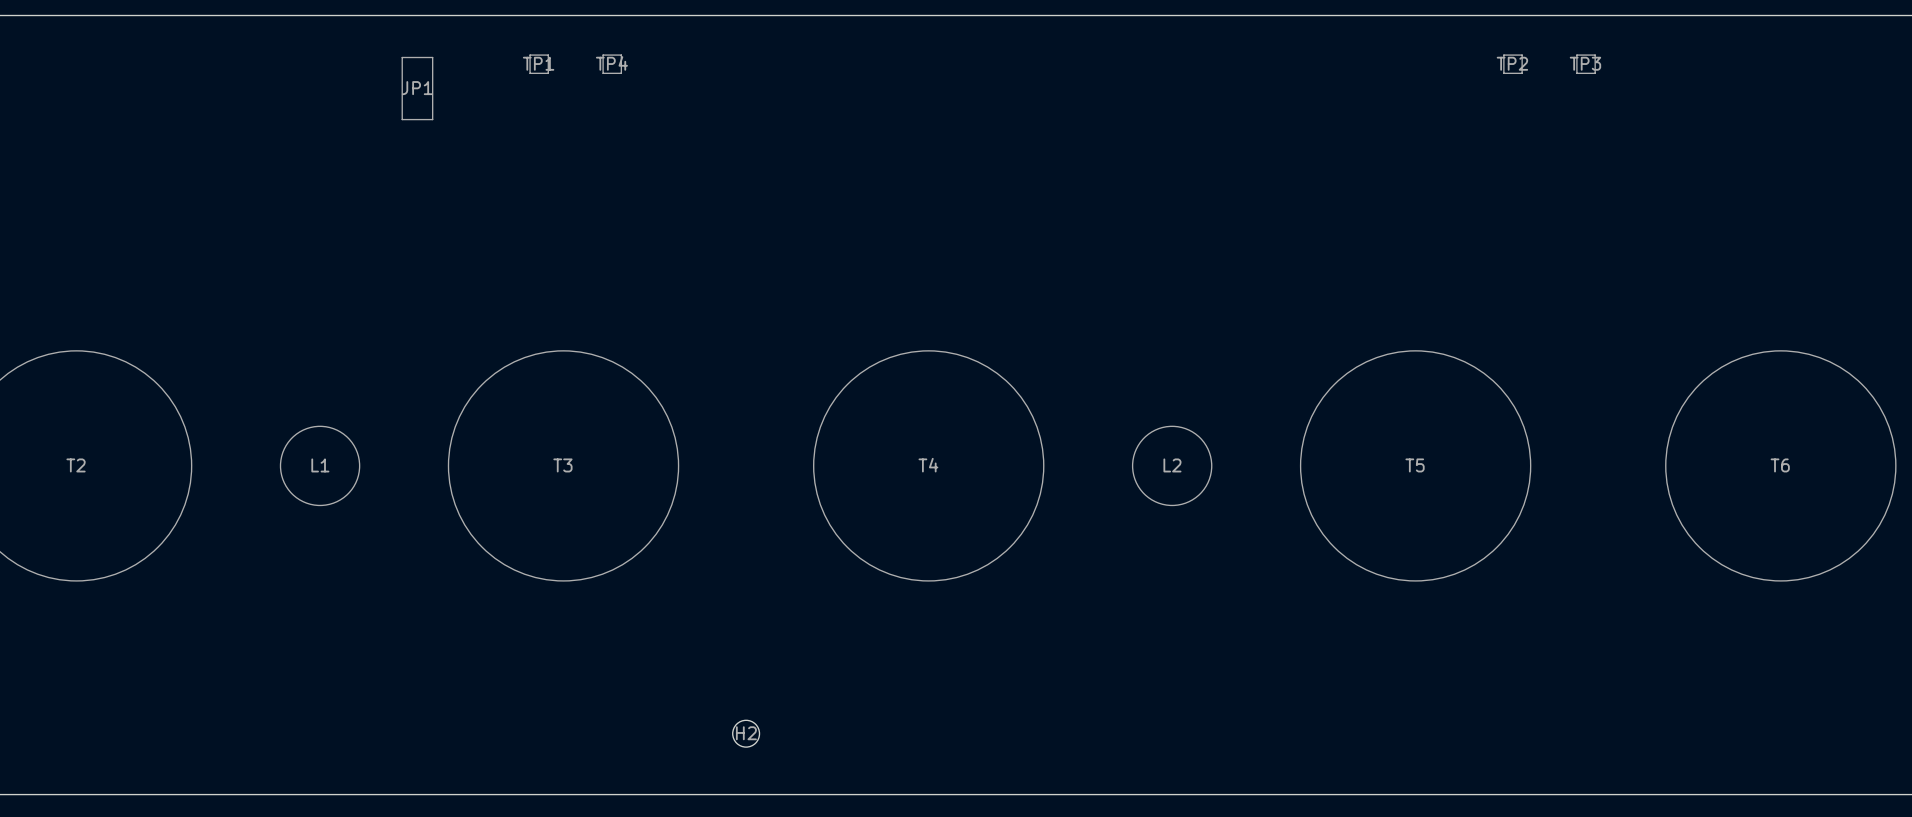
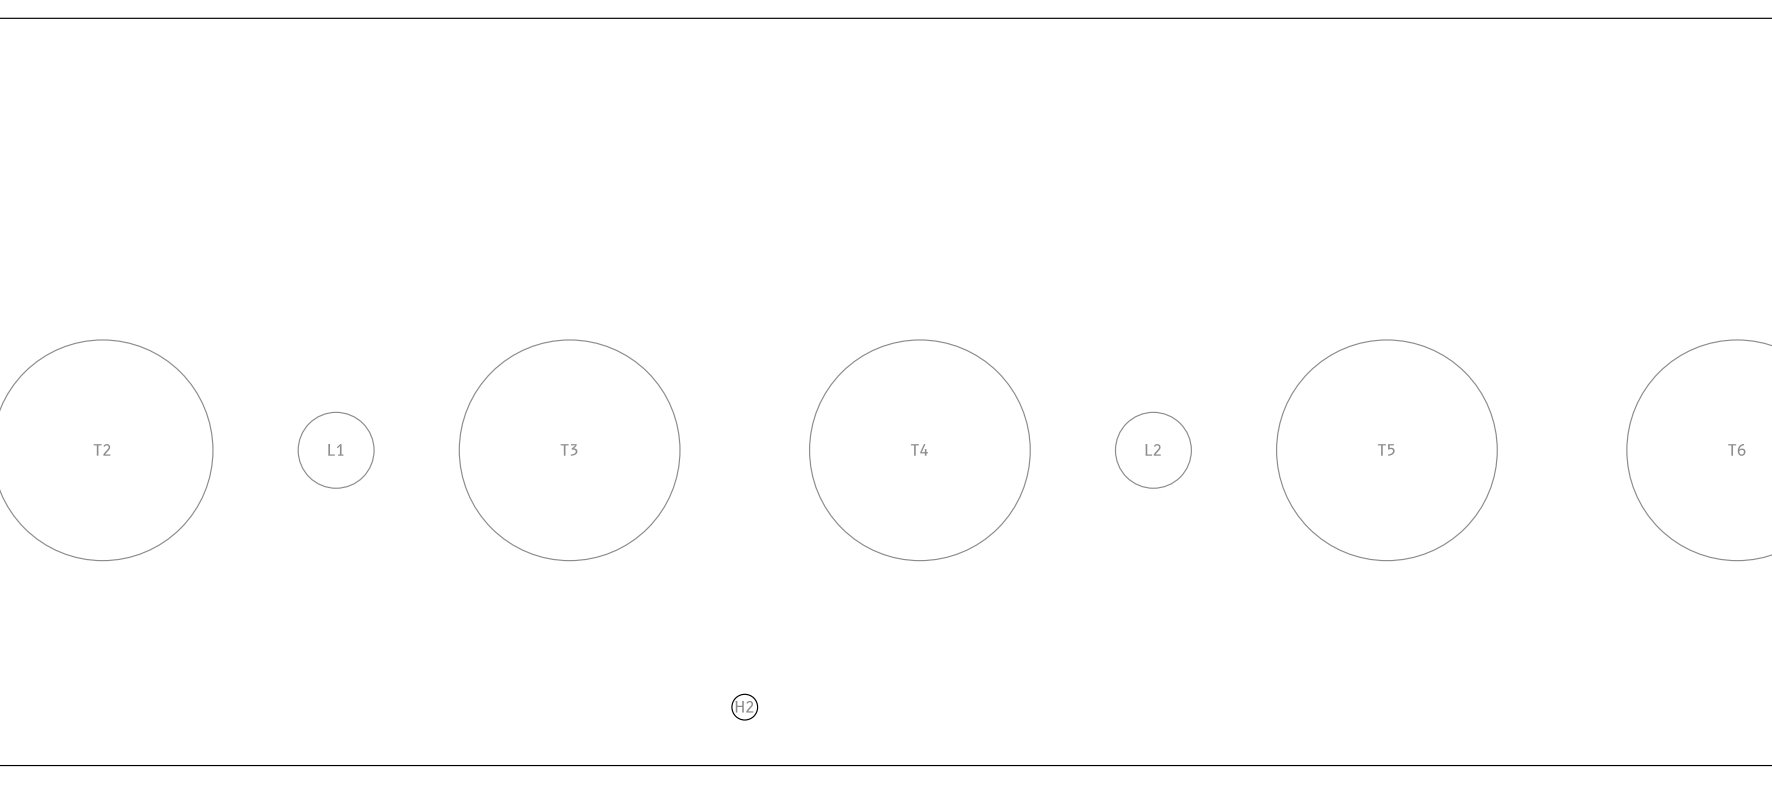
TP1: (539, 64) -> none
TP4: (612, 64) -> none
TP2: (1513, 64) -> none
TP3: (1586, 64) -> none
JP1: (417, 88) -> none

